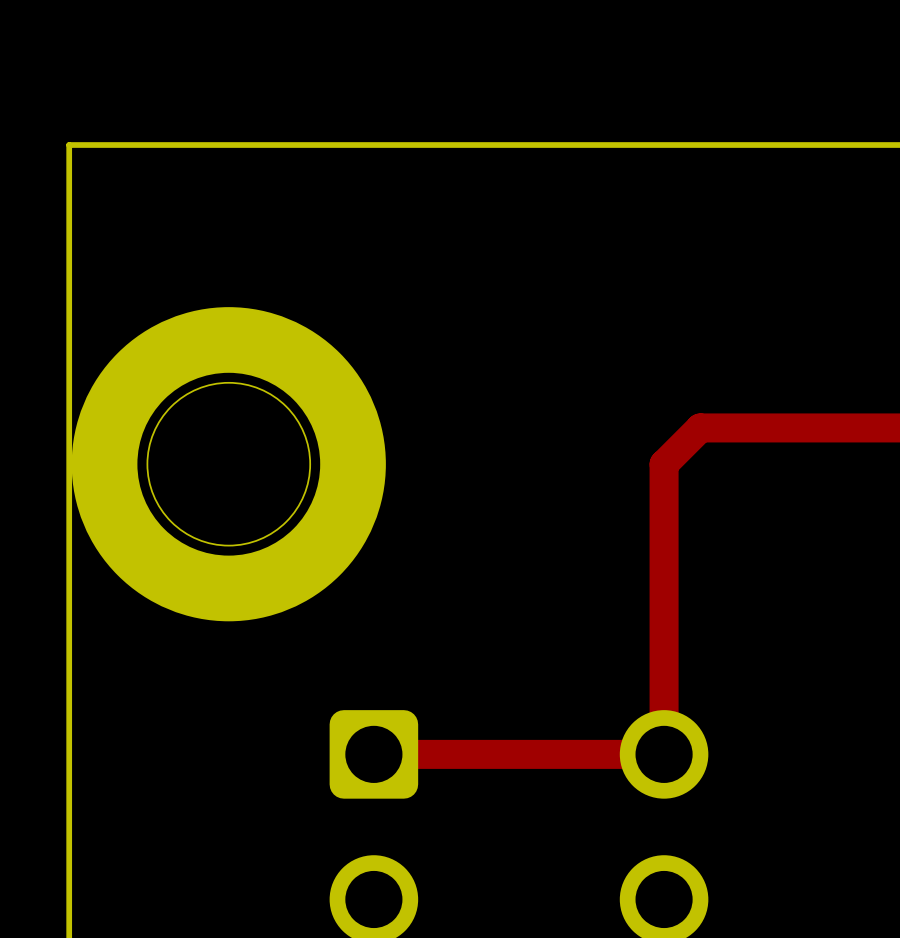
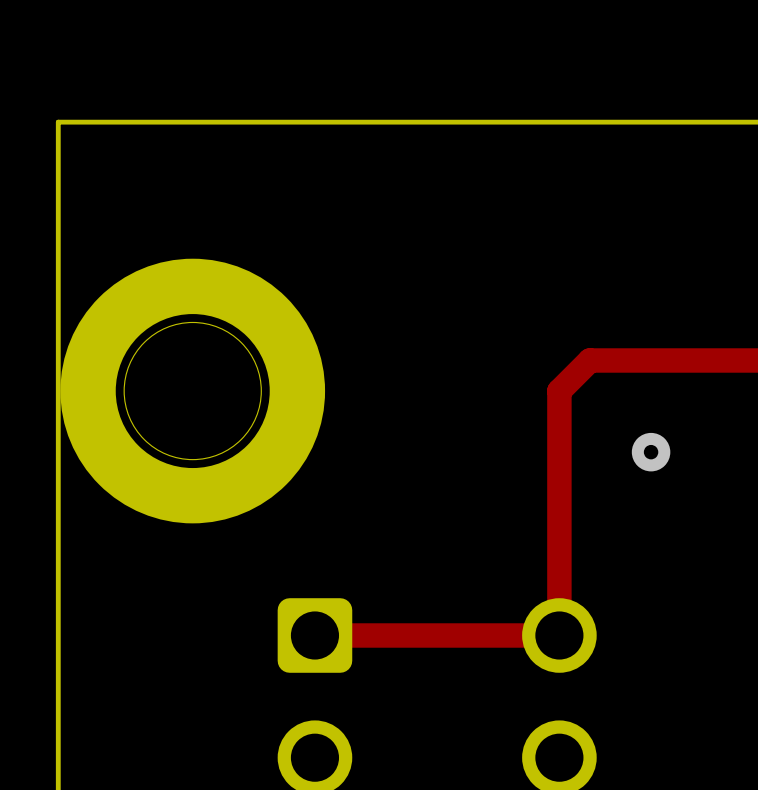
via: none -> (651, 452)

